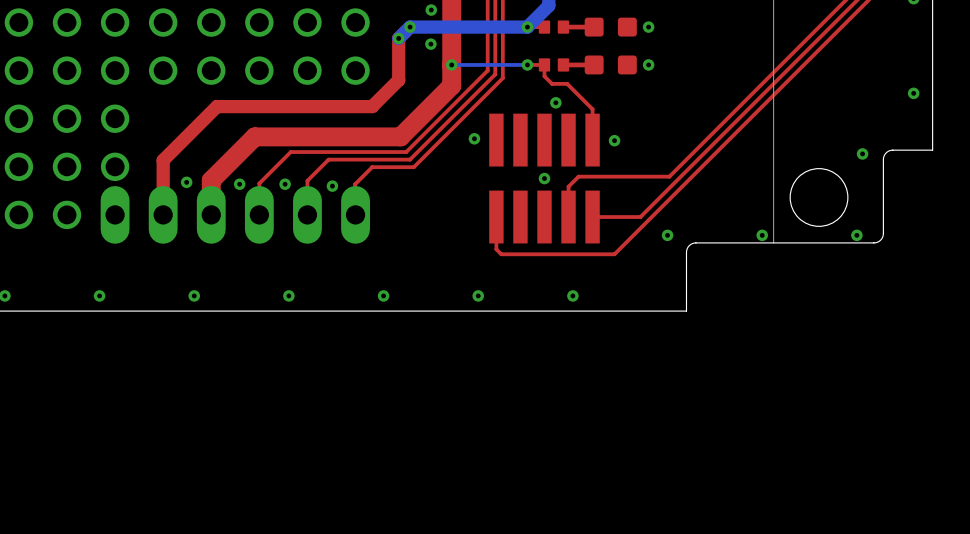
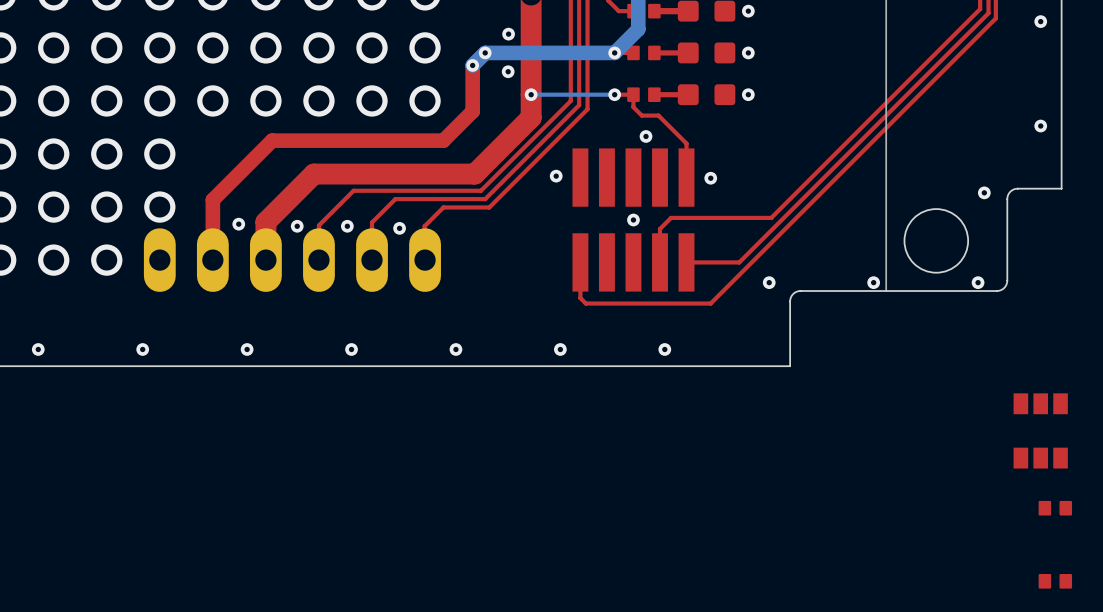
part: none -> (1040, 430)
part: none -> (1055, 508)
part: none -> (1055, 581)

